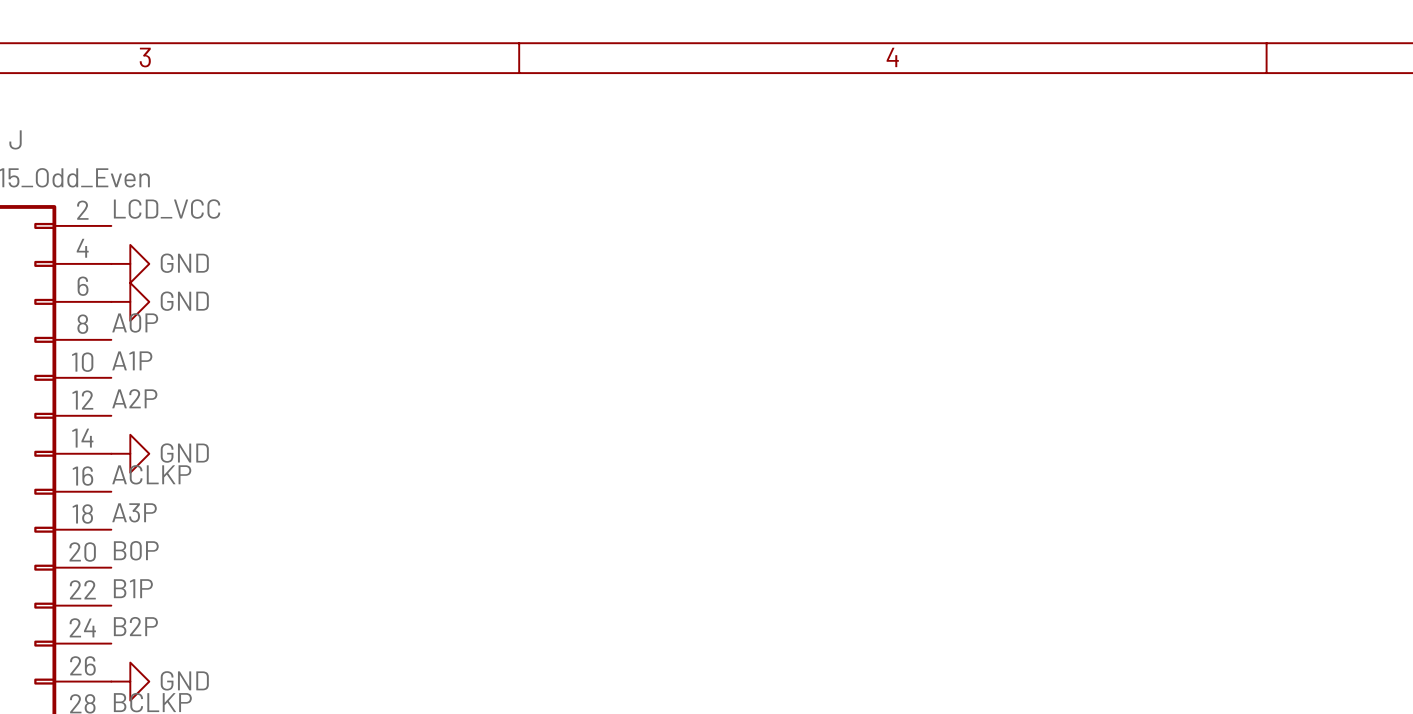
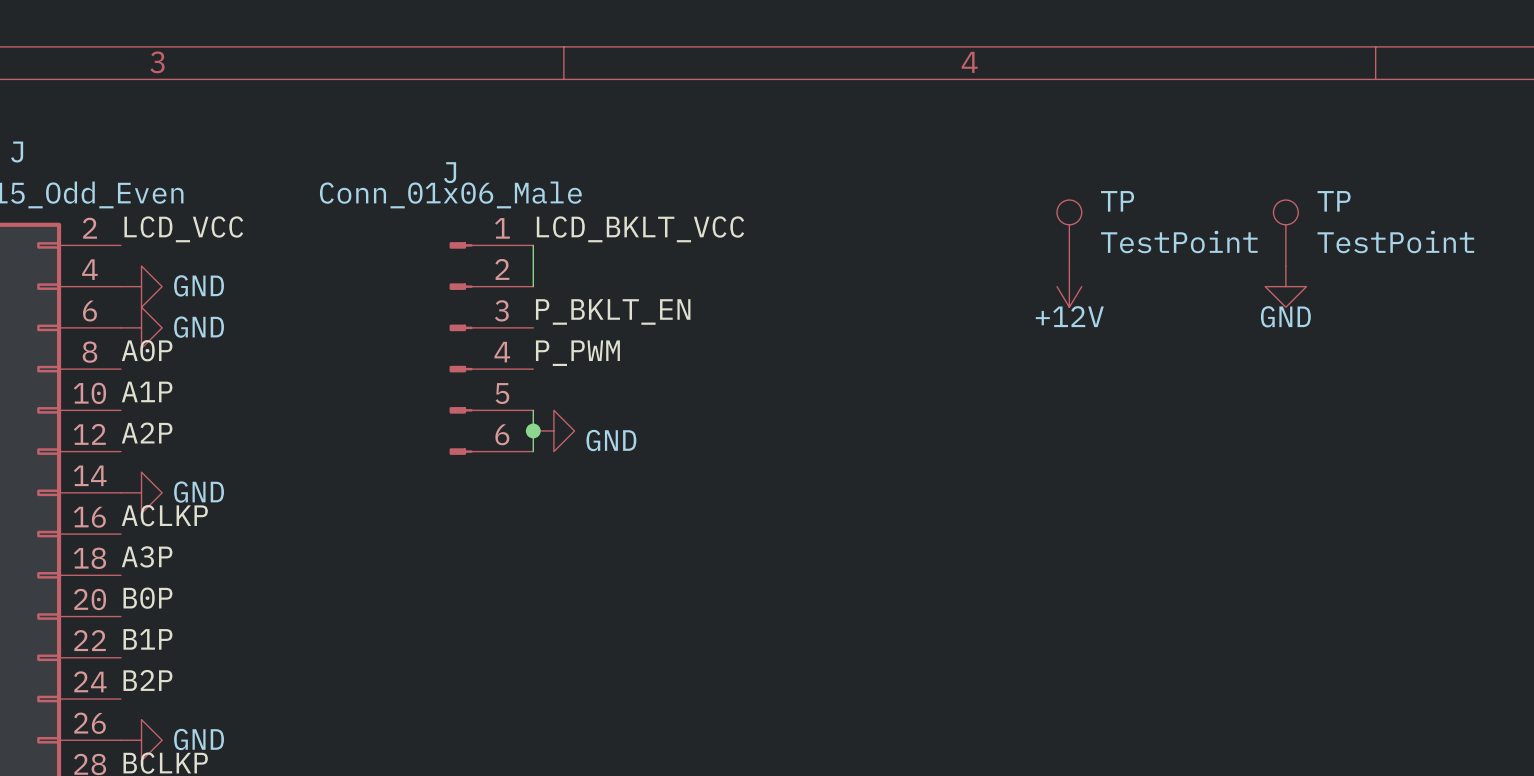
label: none -> LCD_BKLT_VCC (640, 229)
TP: none -> TestPoint (1069, 233)
TP: none -> TestPoint (1285, 233)
wire: none -> (533, 245) (533, 286)
power symbol: none -> +12V (1069, 286)
power symbol: none -> GND (1285, 286)
label: none -> P_BKLT_EN (613, 311)
J: none -> Conn_01x06_Male (491, 348)
label: none -> P_PWM (577, 353)
wire: none -> (533, 410) (533, 451)
junction: none -> (533, 430)
power symbol: none -> GND (553, 430)

